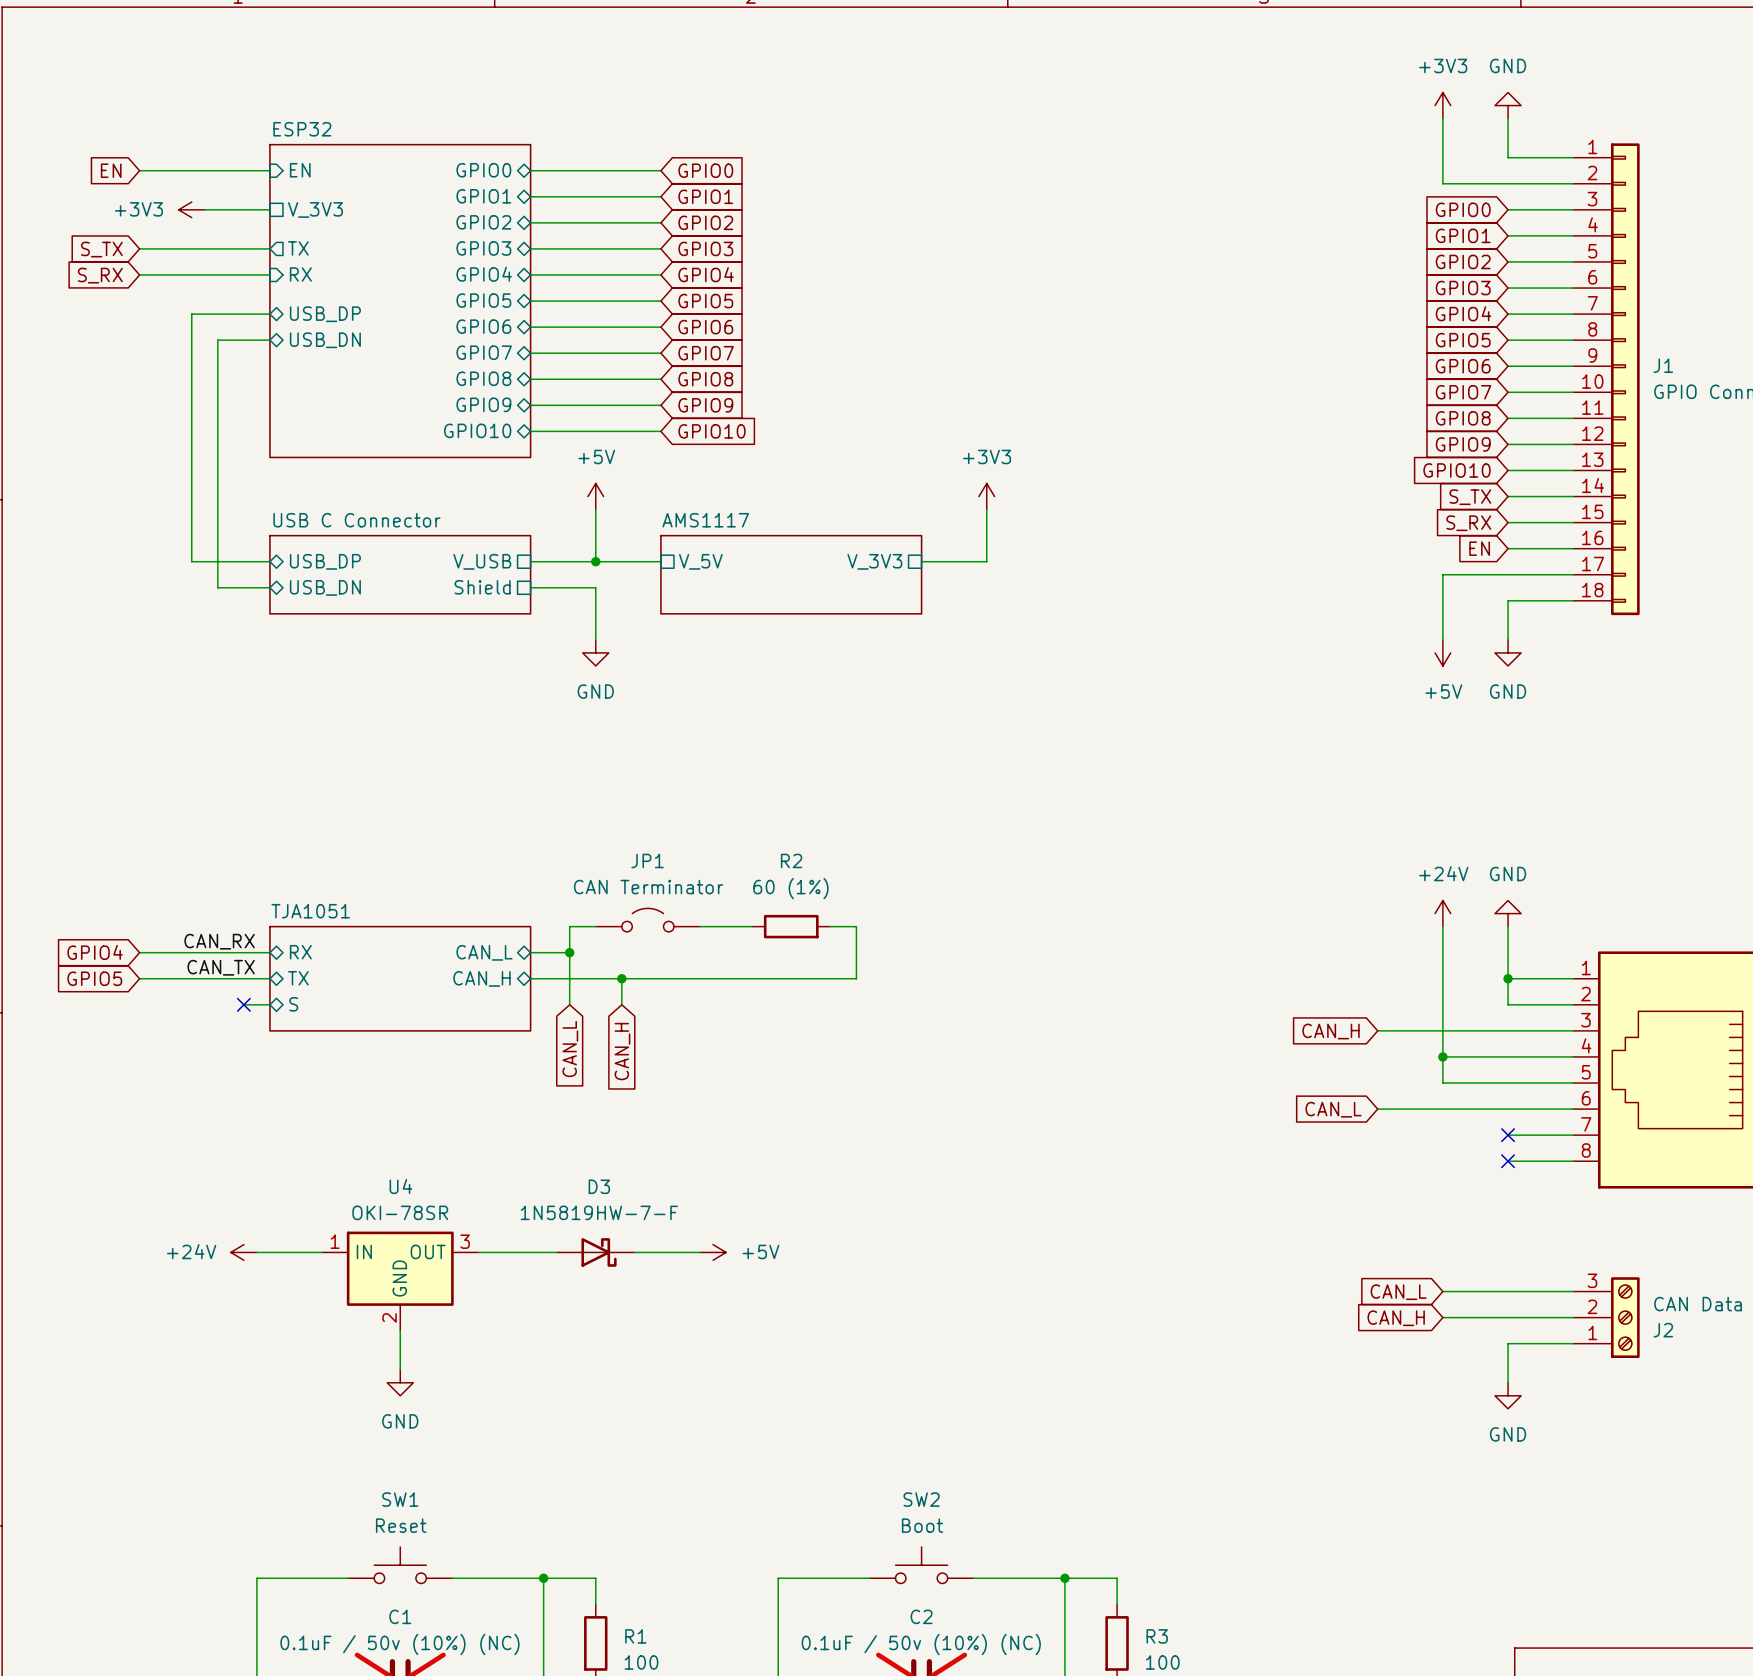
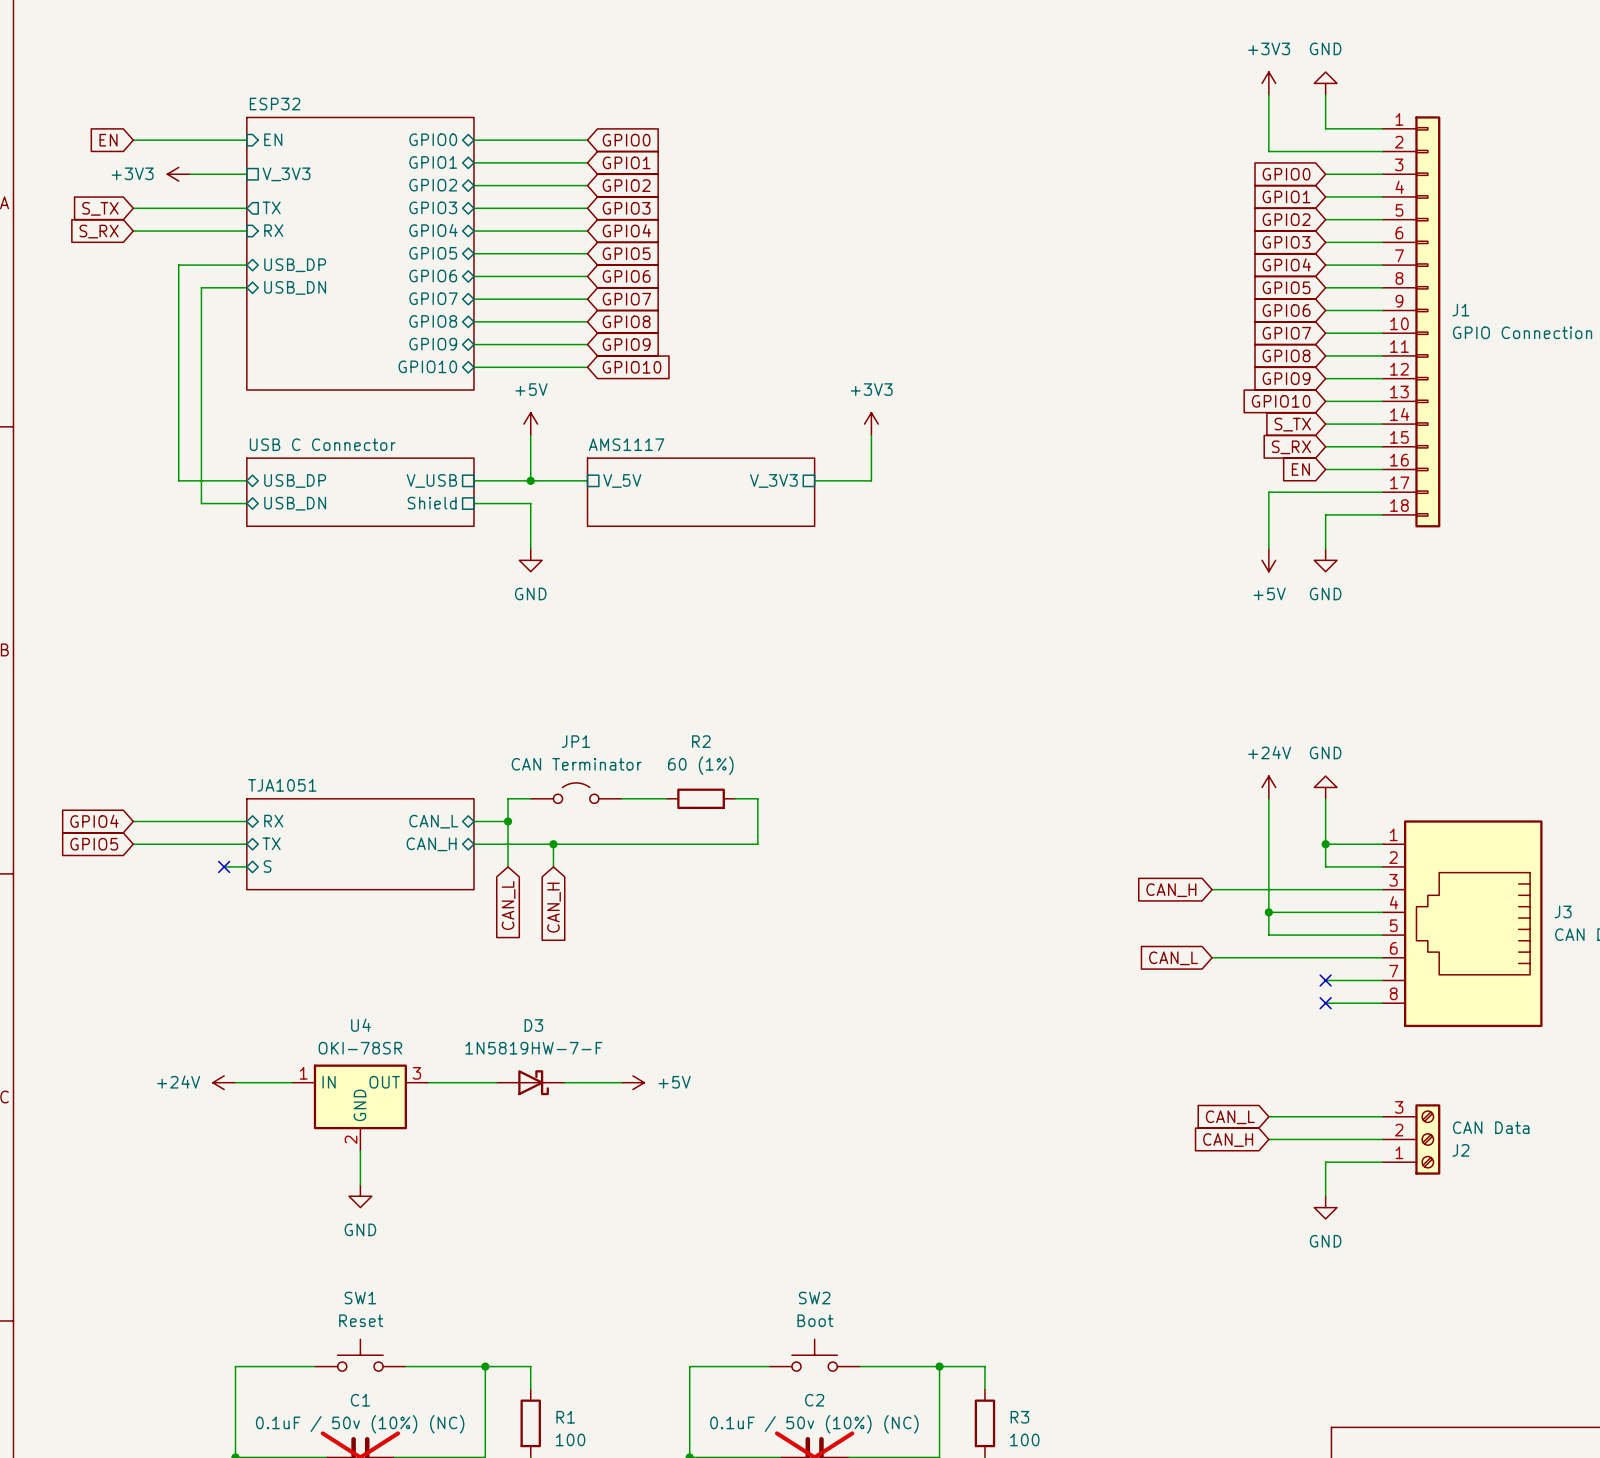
label: CAN_RX (219, 941) -> none
label: CAN_TX (221, 967) -> none

